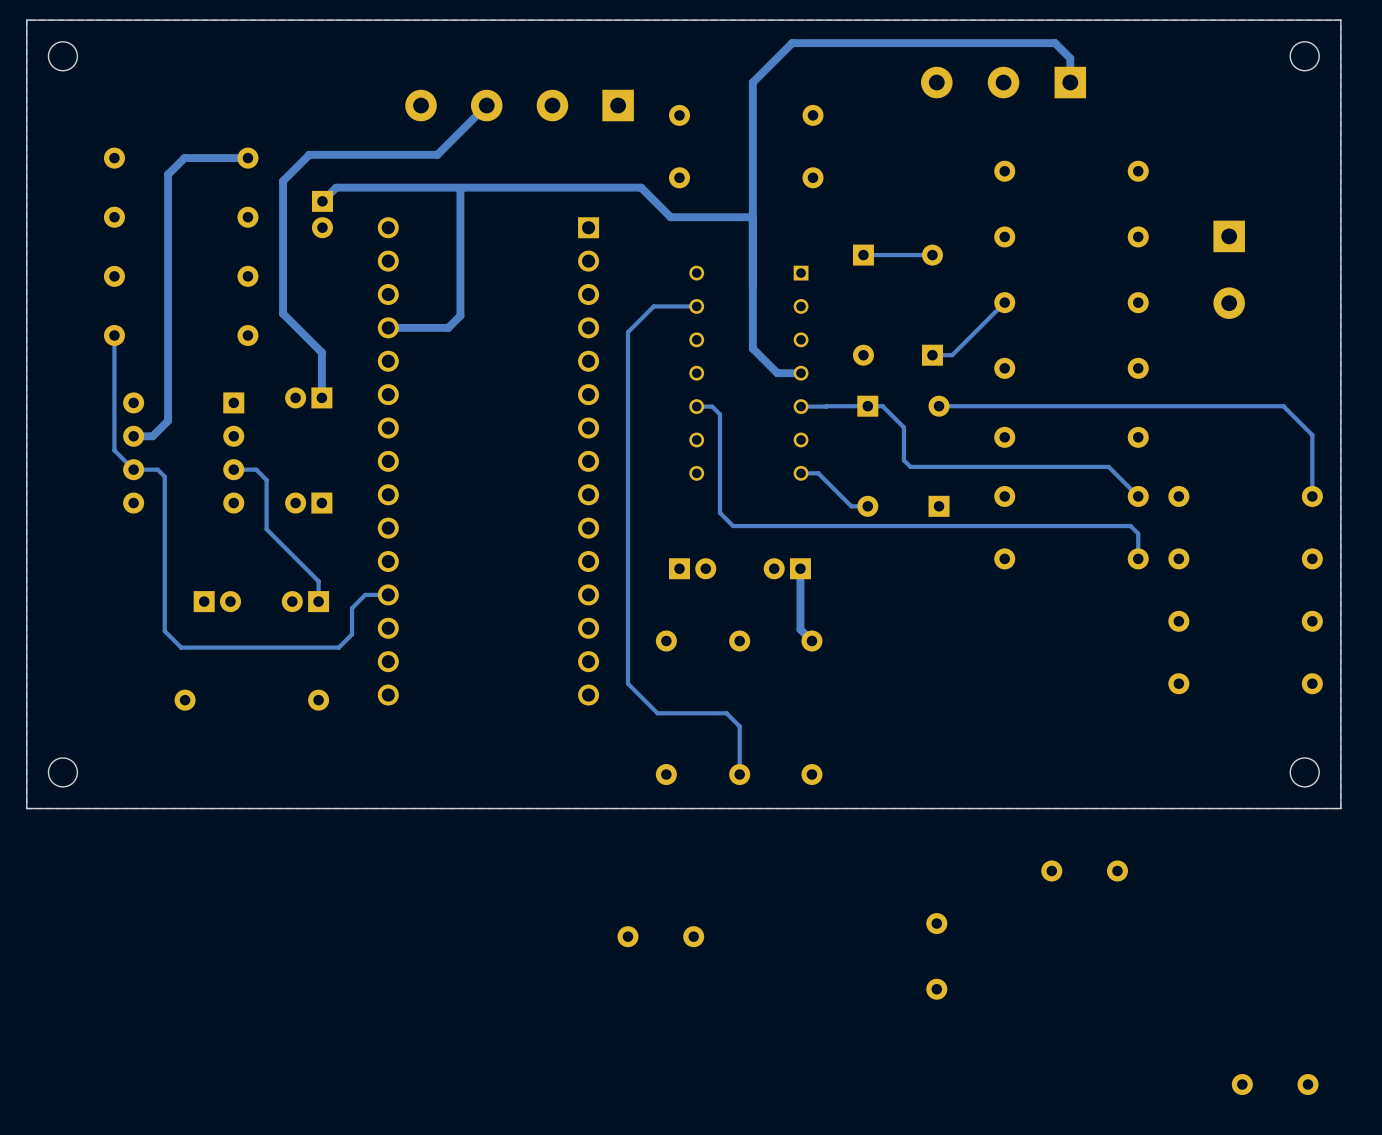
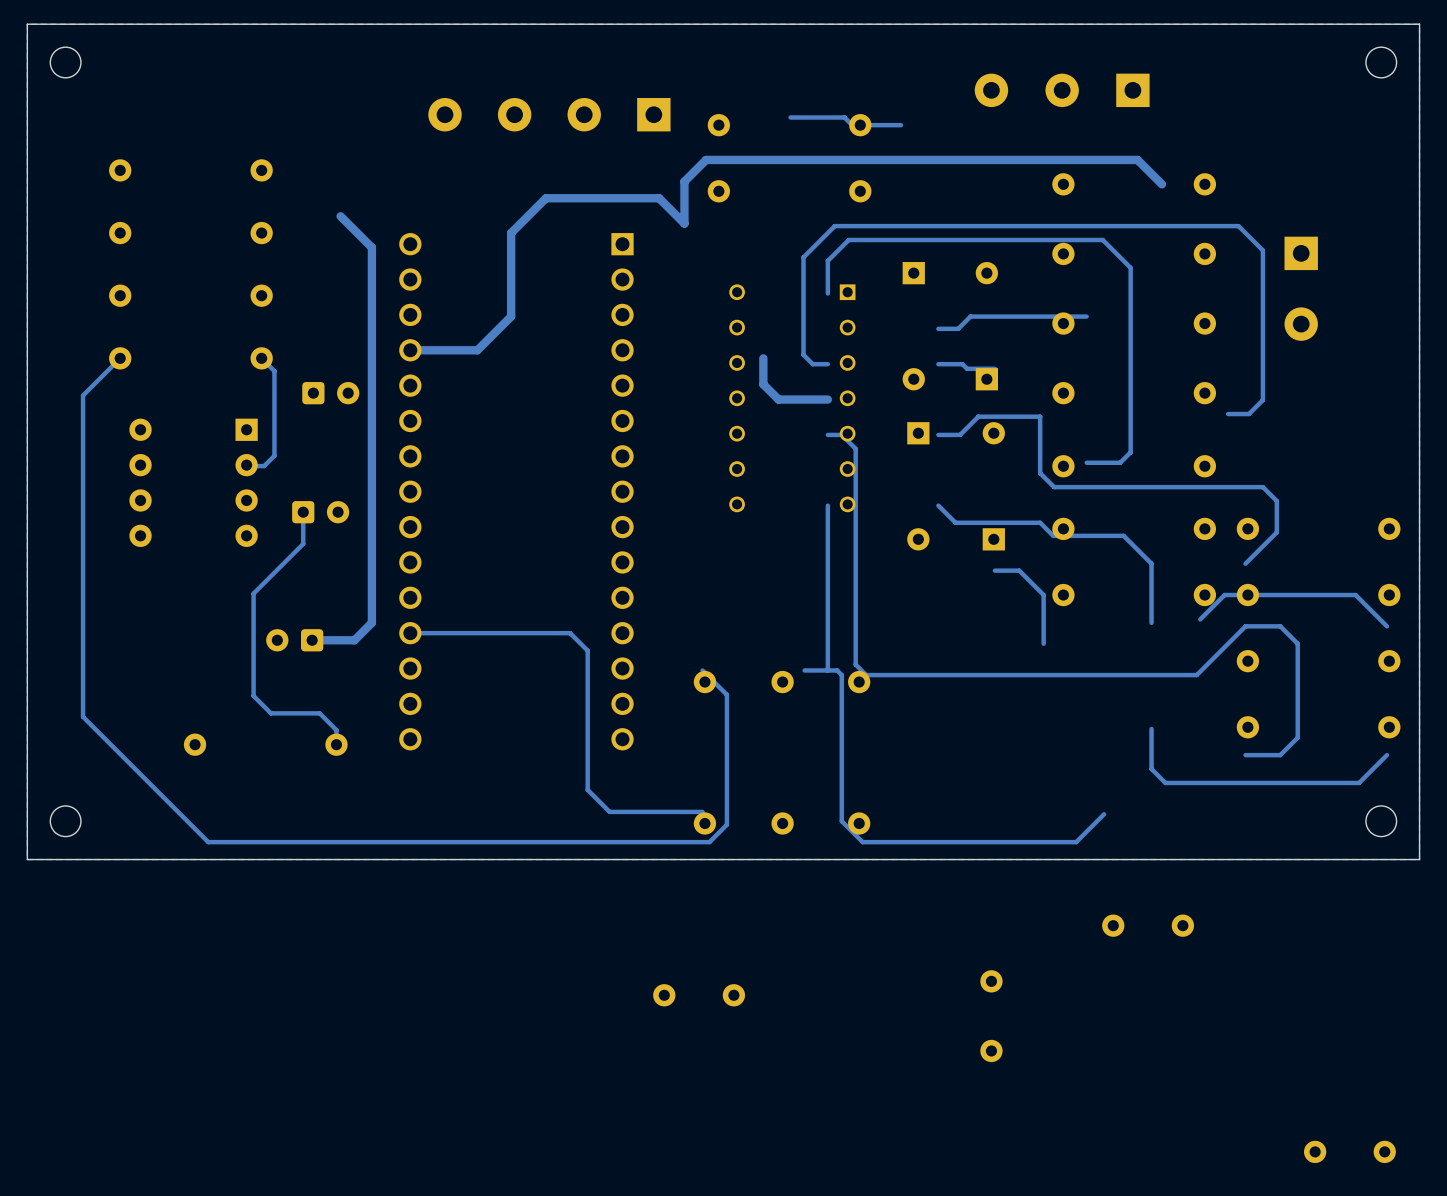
track: (1070, 82) (1070, 58) (1055, 43) (792, 43) (752, 82) (752, 348) (777, 373) (801, 373) -> none
track: (486, 105) (437, 154) (309, 154) (283, 181) (283, 313) (321, 352) (321, 397) -> none
track: none -> (790, 117) (844, 117) (852, 125) (900, 125)
track: (247, 158) (184, 158) (168, 174) (168, 420) (152, 436) (133, 436) -> none
track: (460, 190) (460, 315) (448, 327) -> (1161, 184) (1137, 159) (706, 159) (684, 181) (684, 223) (659, 198) (545, 198) (511, 233) (511, 316) (477, 350) (473, 350)
track: (322, 201) (336, 187) (641, 187) (670, 217) (752, 217) -> (340, 216) (371, 247) (371, 622) (354, 640) (312, 640)
part: (322, 214) -> none
track: (932, 255) (863, 255) -> none
track: none -> (827, 293) (827, 260) (848, 240) (1102, 240) (1130, 267) (1130, 452) (1120, 462) (1086, 462)
track: none -> (1086, 316) (970, 316) (958, 328) (938, 328)
track: (1004, 302) (952, 355) (932, 355) -> none
track: (696, 306) (653, 306) (627, 332) (627, 683) (657, 713) (726, 713) (739, 726) (739, 774) -> none
track: (114, 335) (114, 450) (133, 469) (157, 469) (164, 476) (164, 631) (181, 647) (338, 647) (352, 634) (352, 608) (365, 594) (388, 594) -> (120, 358) (83, 395) (83, 716) (208, 842) (709, 842) (726, 824) (726, 694) (702, 670)
track: none -> (261, 358) (274, 371) (274, 455) (264, 466) (240, 466)
track: none -> (763, 358) (763, 384) (778, 399) (827, 399)
track: none -> (827, 364) (812, 364) (803, 354) (803, 257) (834, 226) (1238, 226) (1262, 250) (1262, 400) (1249, 414) (1228, 414)
track: none -> (938, 364) (962, 364) (967, 368) (994, 368)
part: none -> (330, 393)
part: (308, 397) -> none
track: (696, 406) (712, 406) (719, 414) (719, 512) (733, 526) (1130, 526) (1138, 533) (1138, 558) -> none
track: (801, 406) (882, 406) (903, 427) (903, 460) (910, 466) (1108, 466) (1138, 496) -> none
track: (939, 406) (1283, 406) (1312, 435) (1312, 496) -> none
track: none -> (827, 434) (841, 434) (855, 448) (855, 664) (866, 675) (1196, 675) (1245, 626) (1280, 626) (1297, 643) (1297, 737) (1280, 755) (1245, 755)
track: none -> (938, 434) (960, 434) (978, 416) (1040, 416) (1040, 473) (1054, 487) (1262, 487) (1276, 501) (1276, 532) (1245, 563)
track: (233, 469) (256, 469) (266, 480) (266, 529) (318, 581) (318, 601) -> none
track: (801, 473) (818, 473) (851, 506) (867, 506) -> none
track: none -> (827, 505) (827, 670)
track: none -> (938, 505) (955, 522) (1040, 522) (1053, 535) (1123, 535) (1151, 563) (1151, 622)
track: none -> (303, 512) (303, 543) (253, 593) (253, 695) (270, 713) (319, 713) (336, 730) (336, 744)
part: none -> (320, 512)
part: (308, 503) -> none
track: none -> (994, 570) (1019, 570) (1043, 595) (1043, 643)
part: (692, 568) -> none
part: (787, 568) -> none
track: (800, 568) (800, 629) (811, 641) -> none
track: none -> (1200, 619) (1224, 595) (1355, 595) (1386, 626)
track: none -> (410, 633) (570, 633) (587, 650) (587, 789) (609, 811) (702, 811)
part: (217, 601) -> none
part: none -> (294, 640)
part: (305, 601) -> none
track: none -> (804, 670) (837, 670) (841, 675) (841, 821) (862, 842) (1076, 842) (1104, 814)
track: none -> (1151, 728) (1151, 769) (1165, 782) (1359, 782) (1386, 755)

